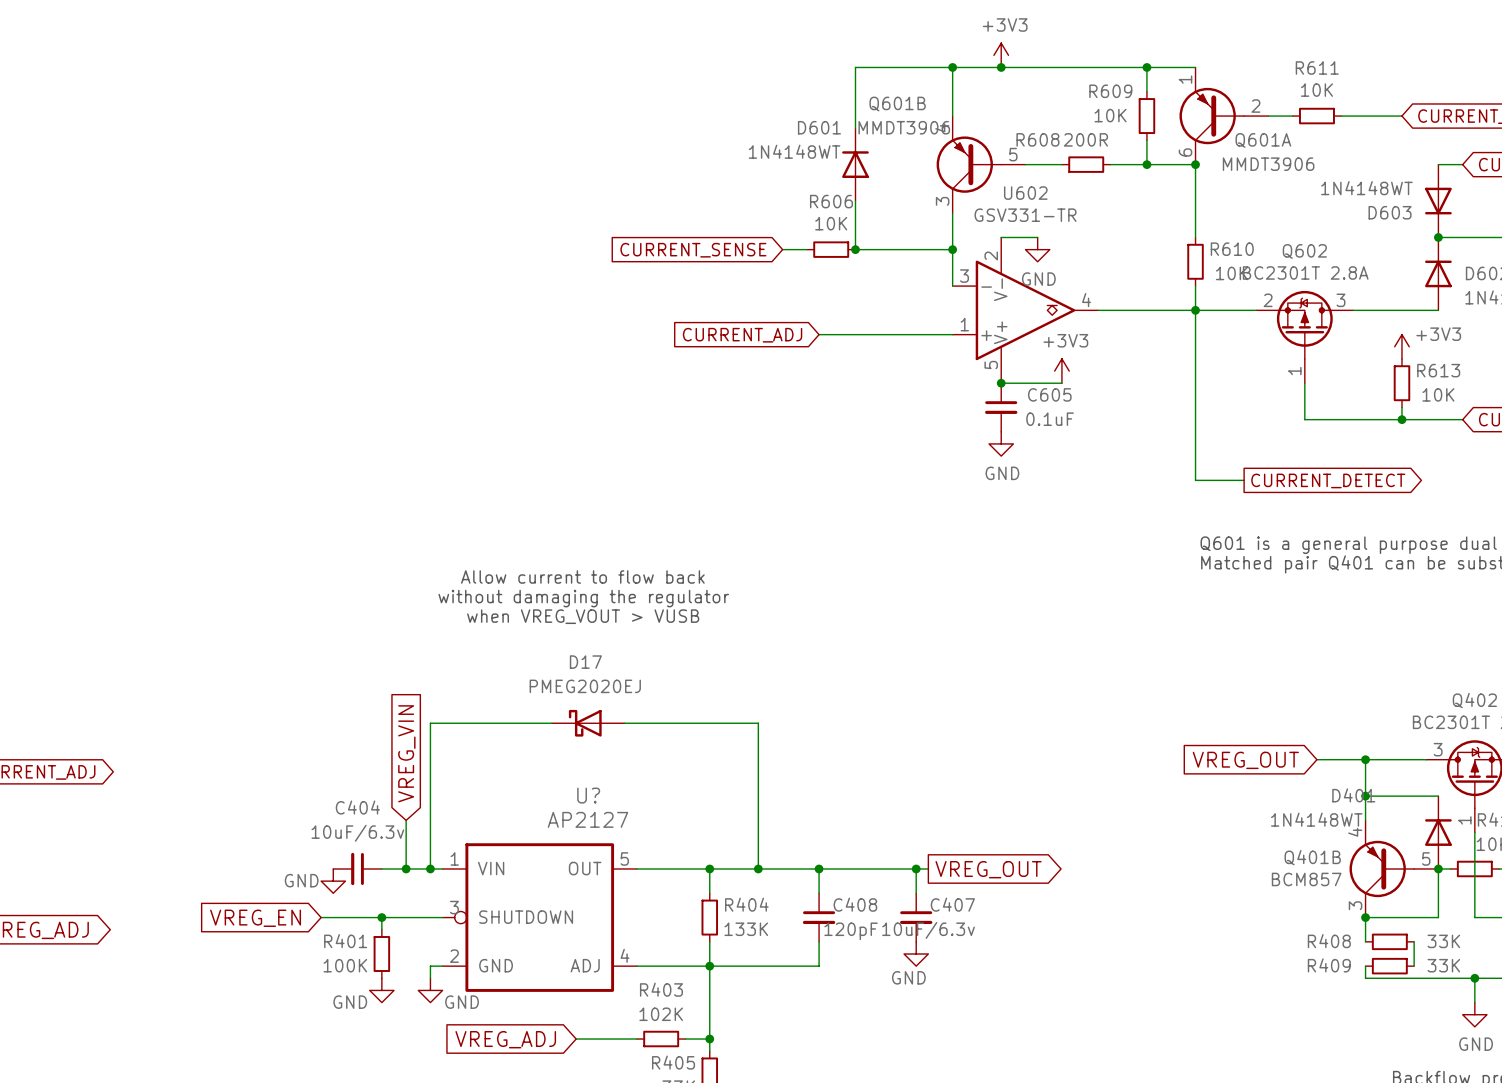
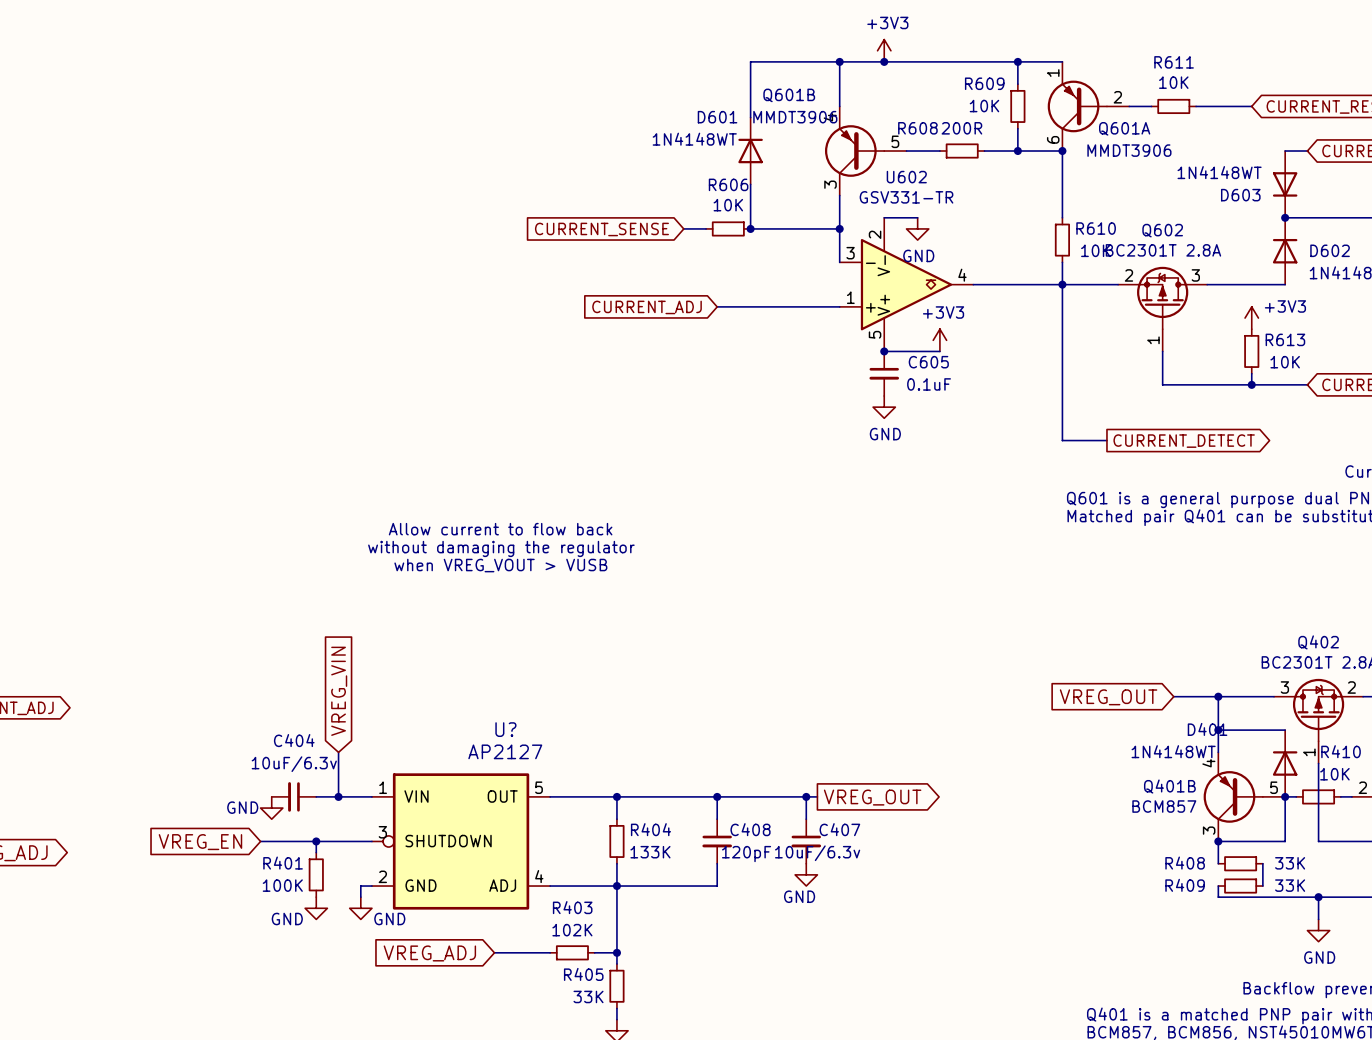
wire: (551, 723) (430, 723) (430, 868) -> none
D17: PMEG2020EJ (588, 723) -> none
wire: (624, 723) (758, 723) (758, 868) -> none
junction: (430, 868) -> none
junction: (758, 868) -> none

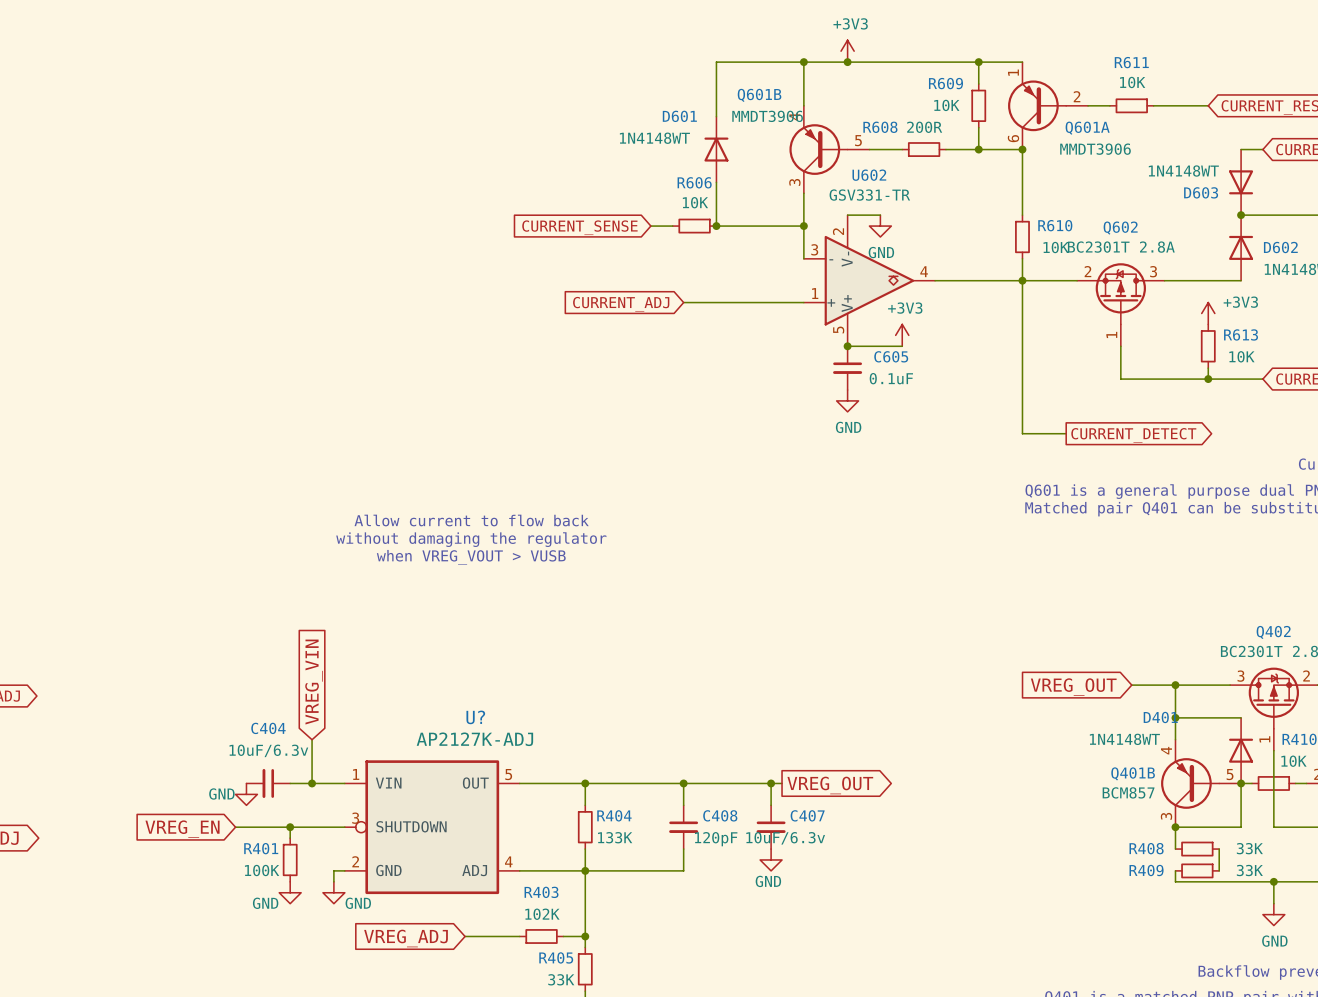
U? value: AP2127 (505, 751) -> AP2127K-ADJ (474, 739)

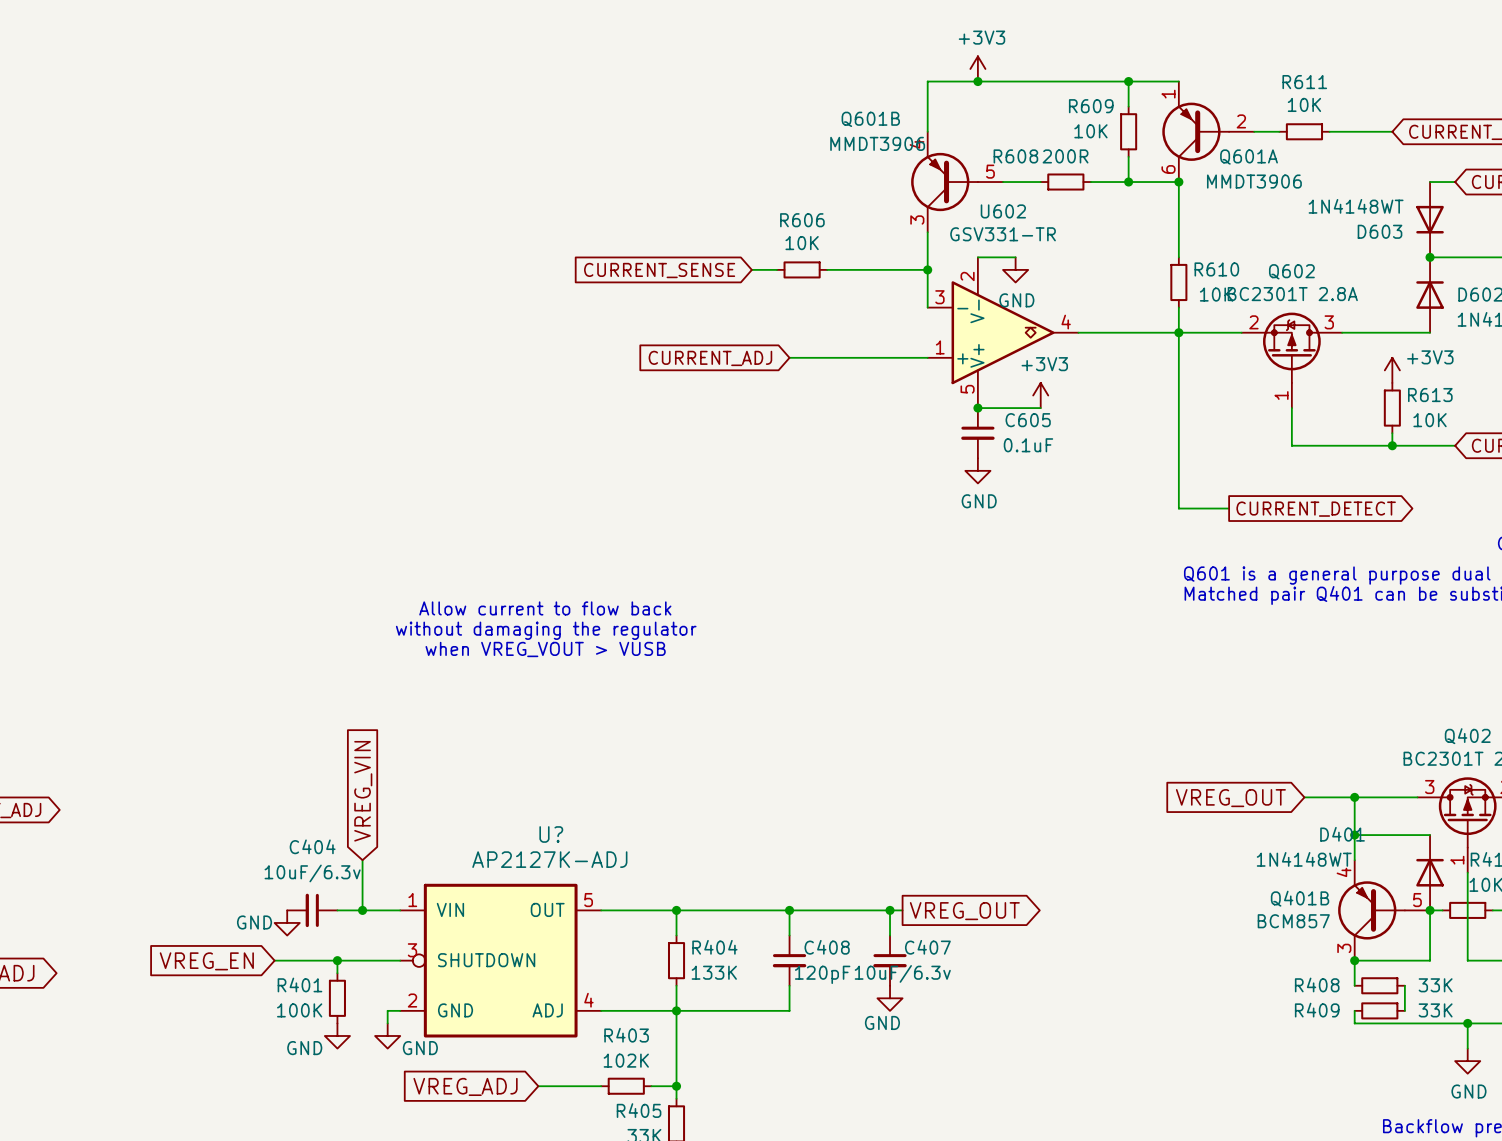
wire: (803, 62) (716, 62) (716, 116) -> none
junction: (803, 62) -> none
D601: 1N4148WT (716, 149) -> none
wire: (716, 182) (716, 226) -> none
junction: (716, 226) -> none

